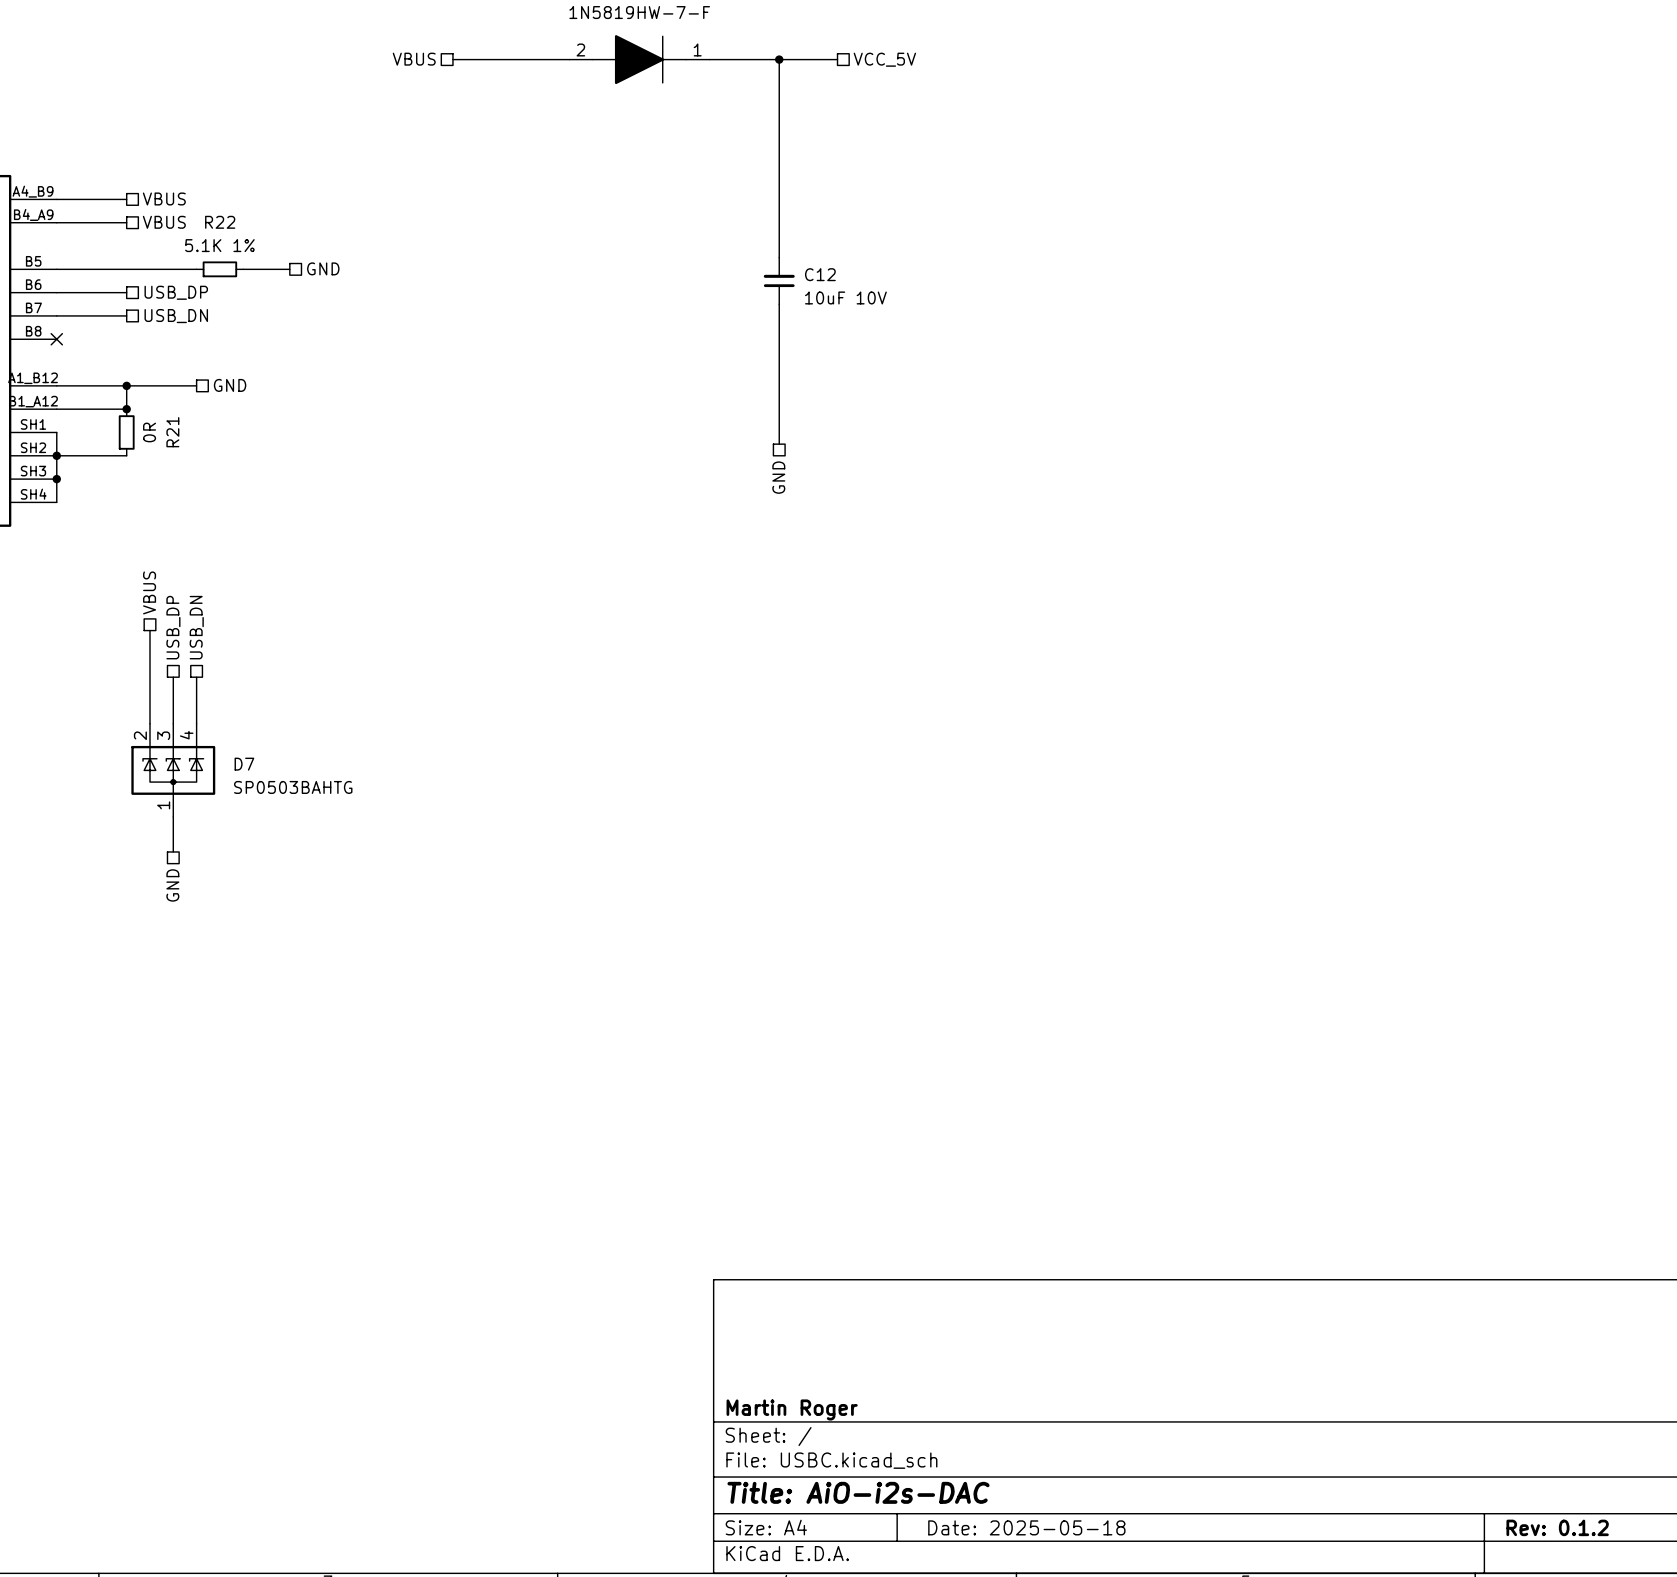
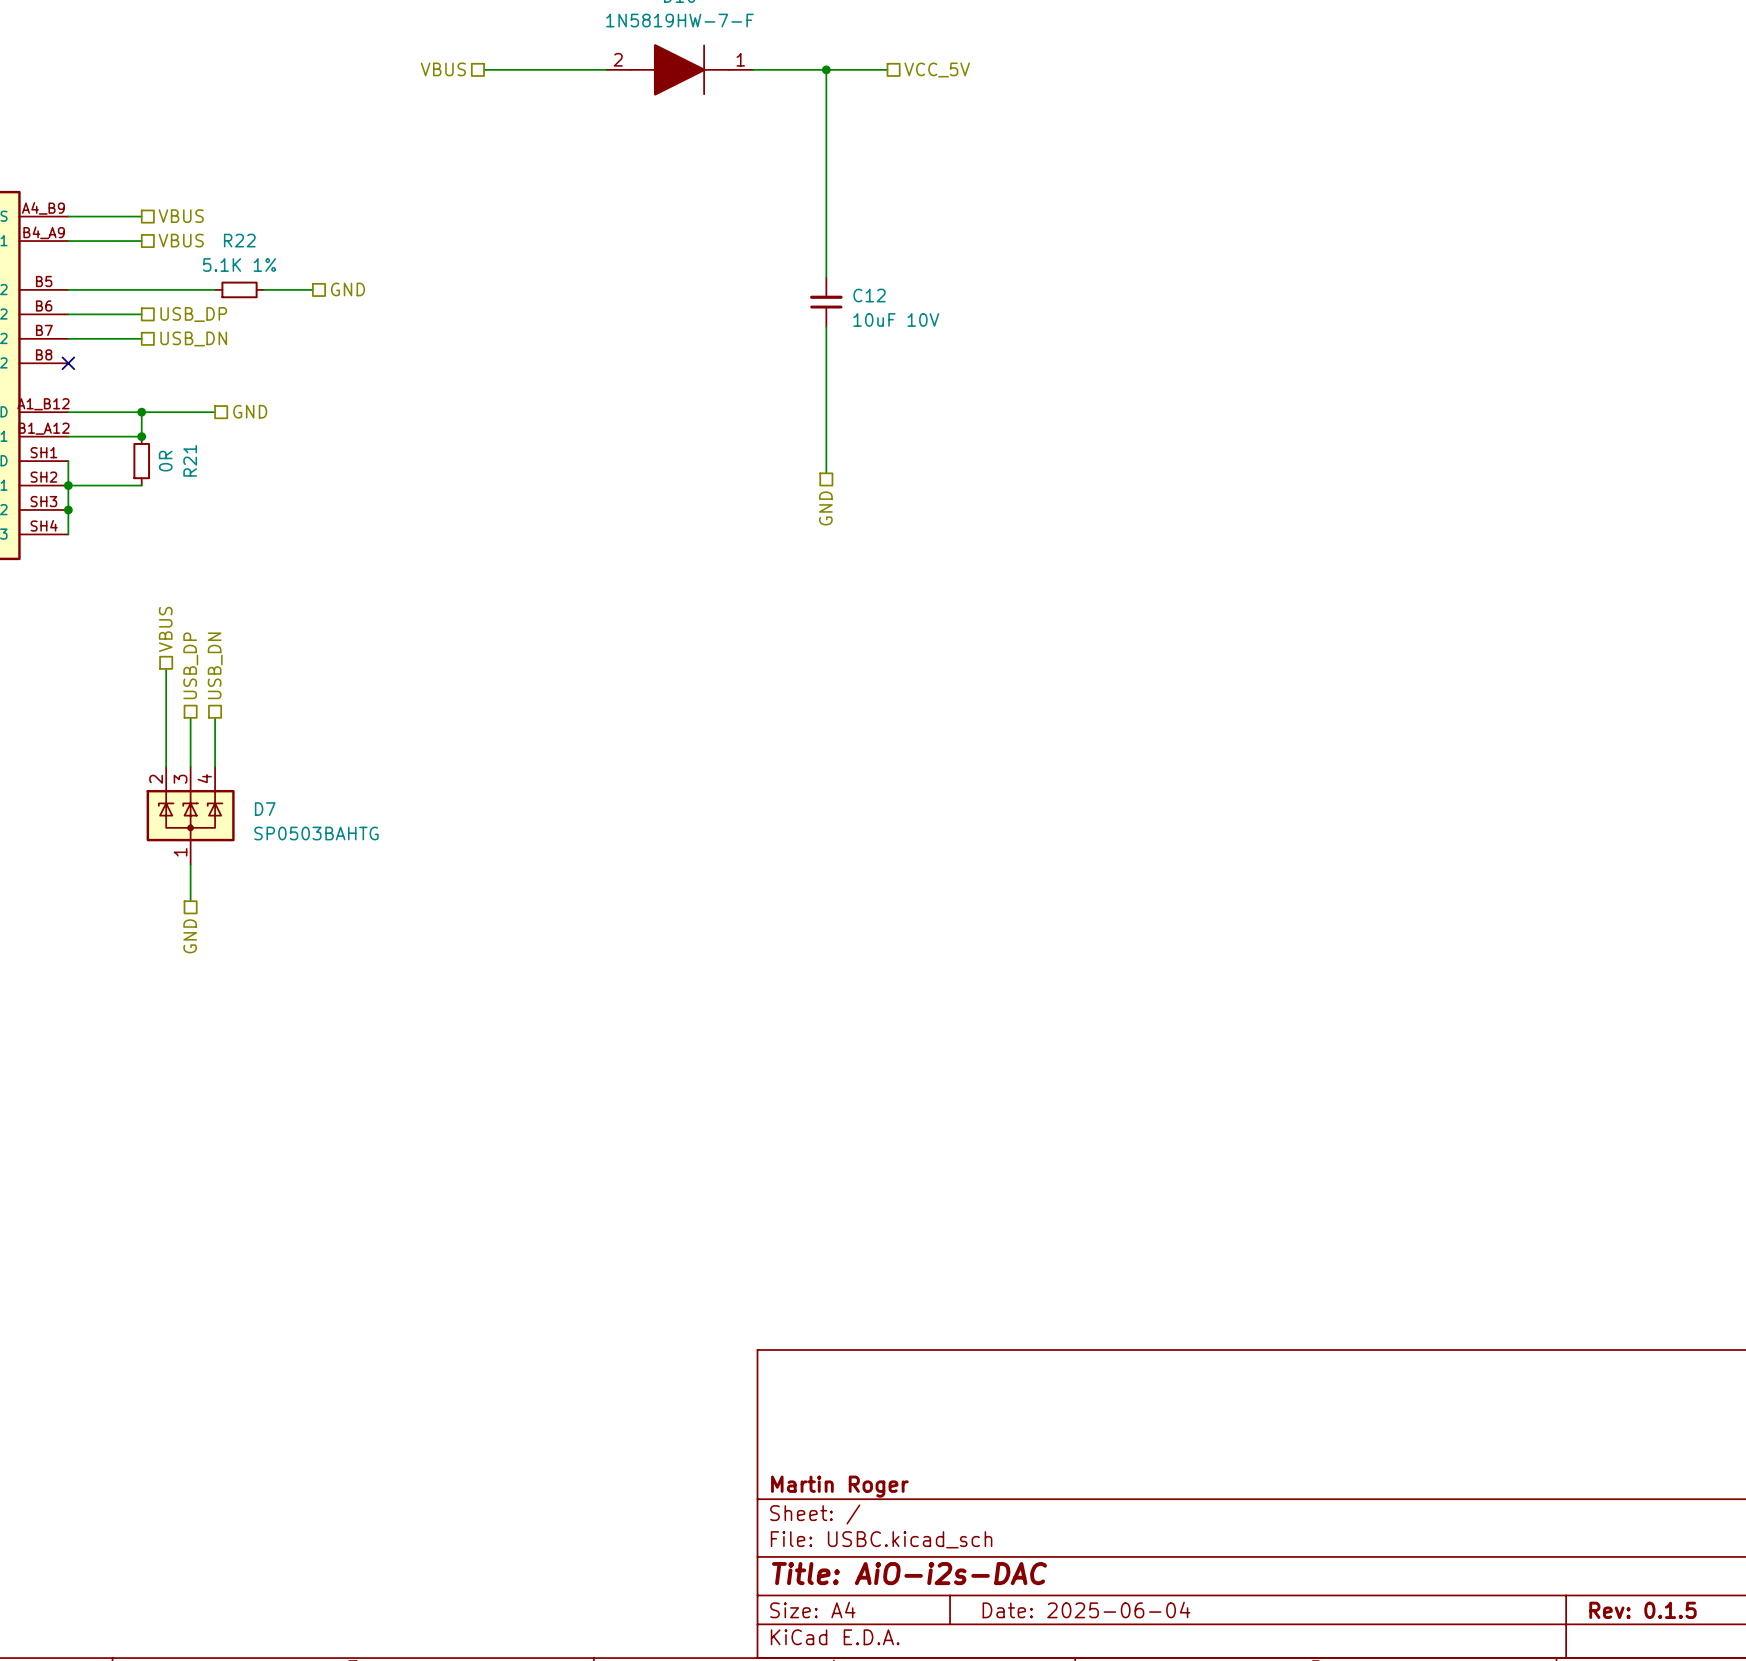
title block: Date: 2025-05-18 (1026, 1527) -> Date: 2025-06-04 (1086, 1609)
title block: Rev: 0.1.2 (1557, 1527) -> Rev: 0.1.5 (1642, 1610)

